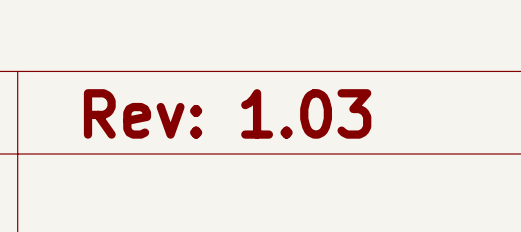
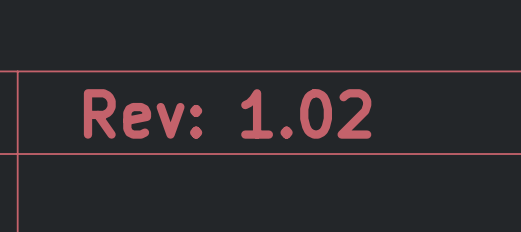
title block: Rev: 1.03 (227, 113) -> Rev: 1.02 (227, 113)

